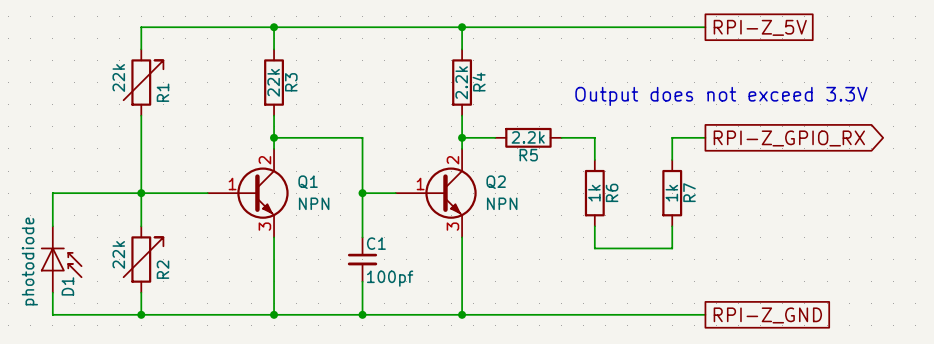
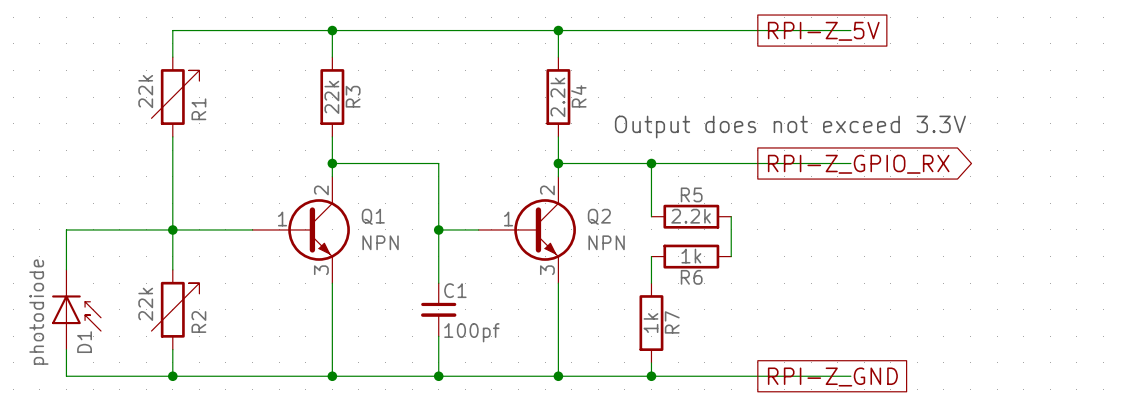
global label position: RPI-Z_5V (760, 27) -> RPI-Z_5V (823, 31)
text position: Output does not exceed 3.3V (721, 96) -> Output does not exceed 3.3V (790, 127)
wire: none -> (598, 163) (678, 163)
R5 position: (528, 137) -> (691, 216)
wire: none -> (651, 163) (651, 216)
junction: none -> (651, 163)
wire: (594, 137) (594, 159) -> (717, 163) (811, 163)
wire: (672, 137) (672, 159) -> (651, 256) (651, 283)
global label position: RPI-Z_GPIO_RX (789, 138) -> RPI-Z_GPIO_RX (858, 164)
R5 name position: R5 (528, 155) -> R5 (691, 194)
wire: none -> (731, 216) (731, 256)
R6 rotation: 0° (594, 193) -> 90° clockwise (691, 256)
R7 position: (672, 193) -> (651, 323)
wire: (594, 226) (594, 248) (672, 248) (672, 226) -> none
wire: none -> (651, 362) (651, 376)
junction: none -> (651, 376)
global label position: RPI-Z_GND (767, 315) -> RPI-Z_GND (832, 377)

